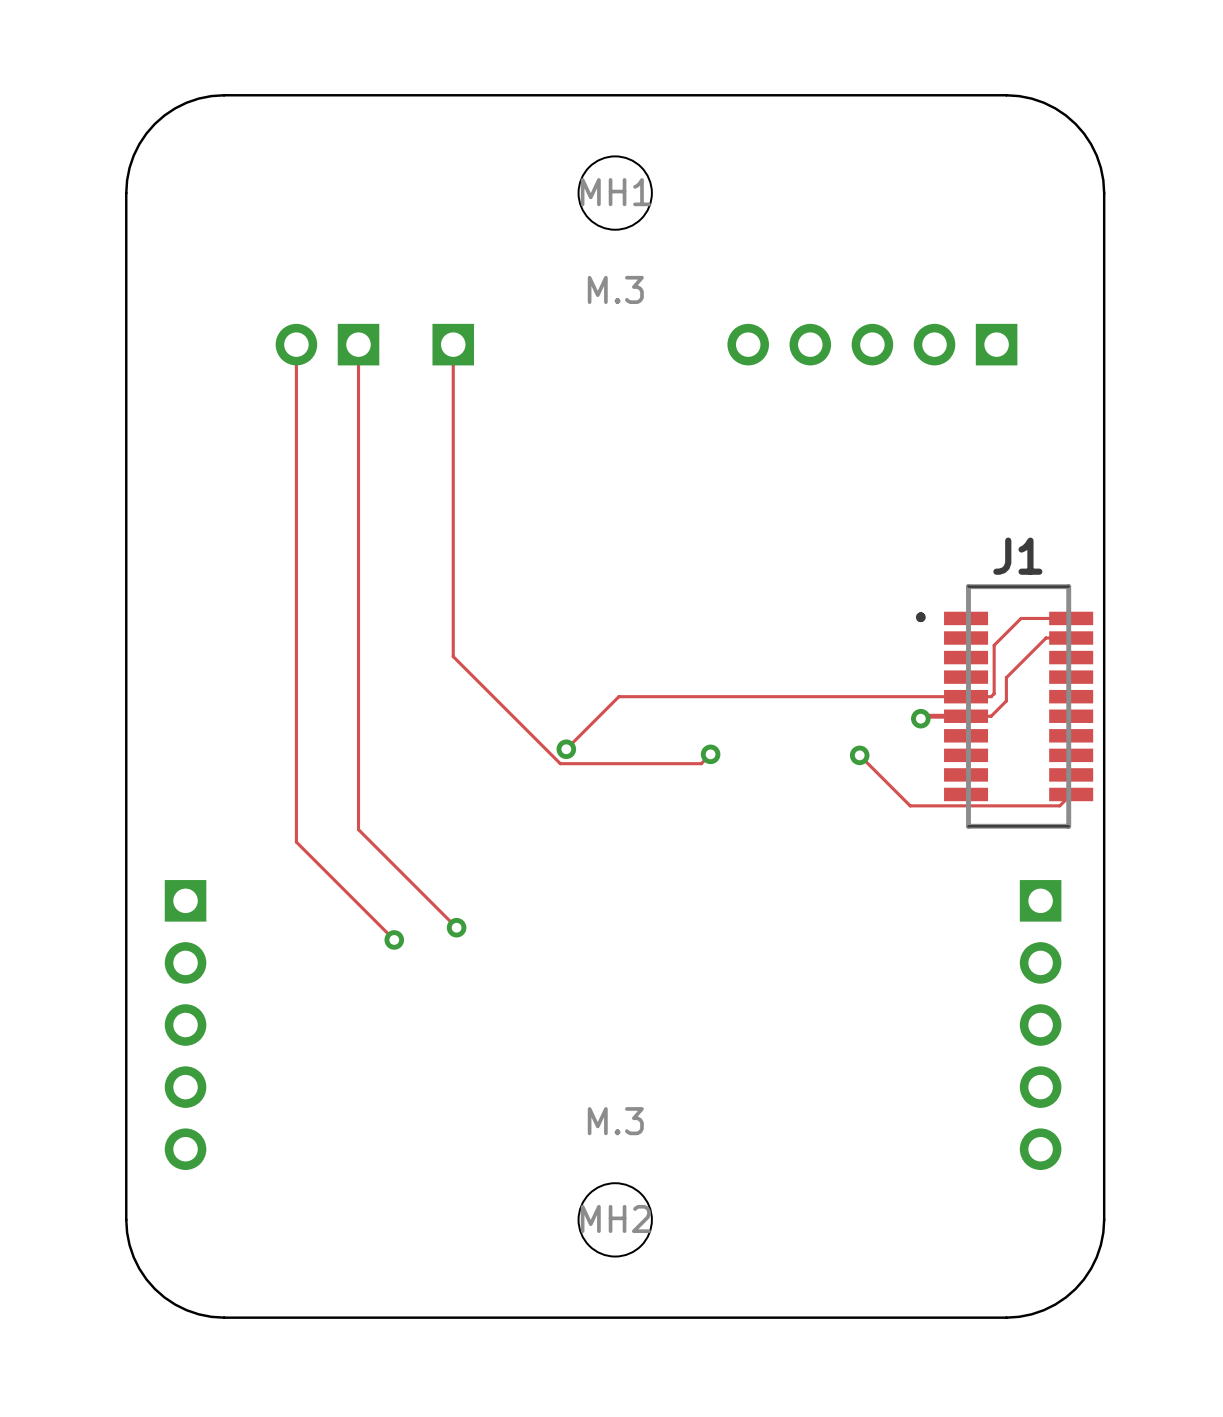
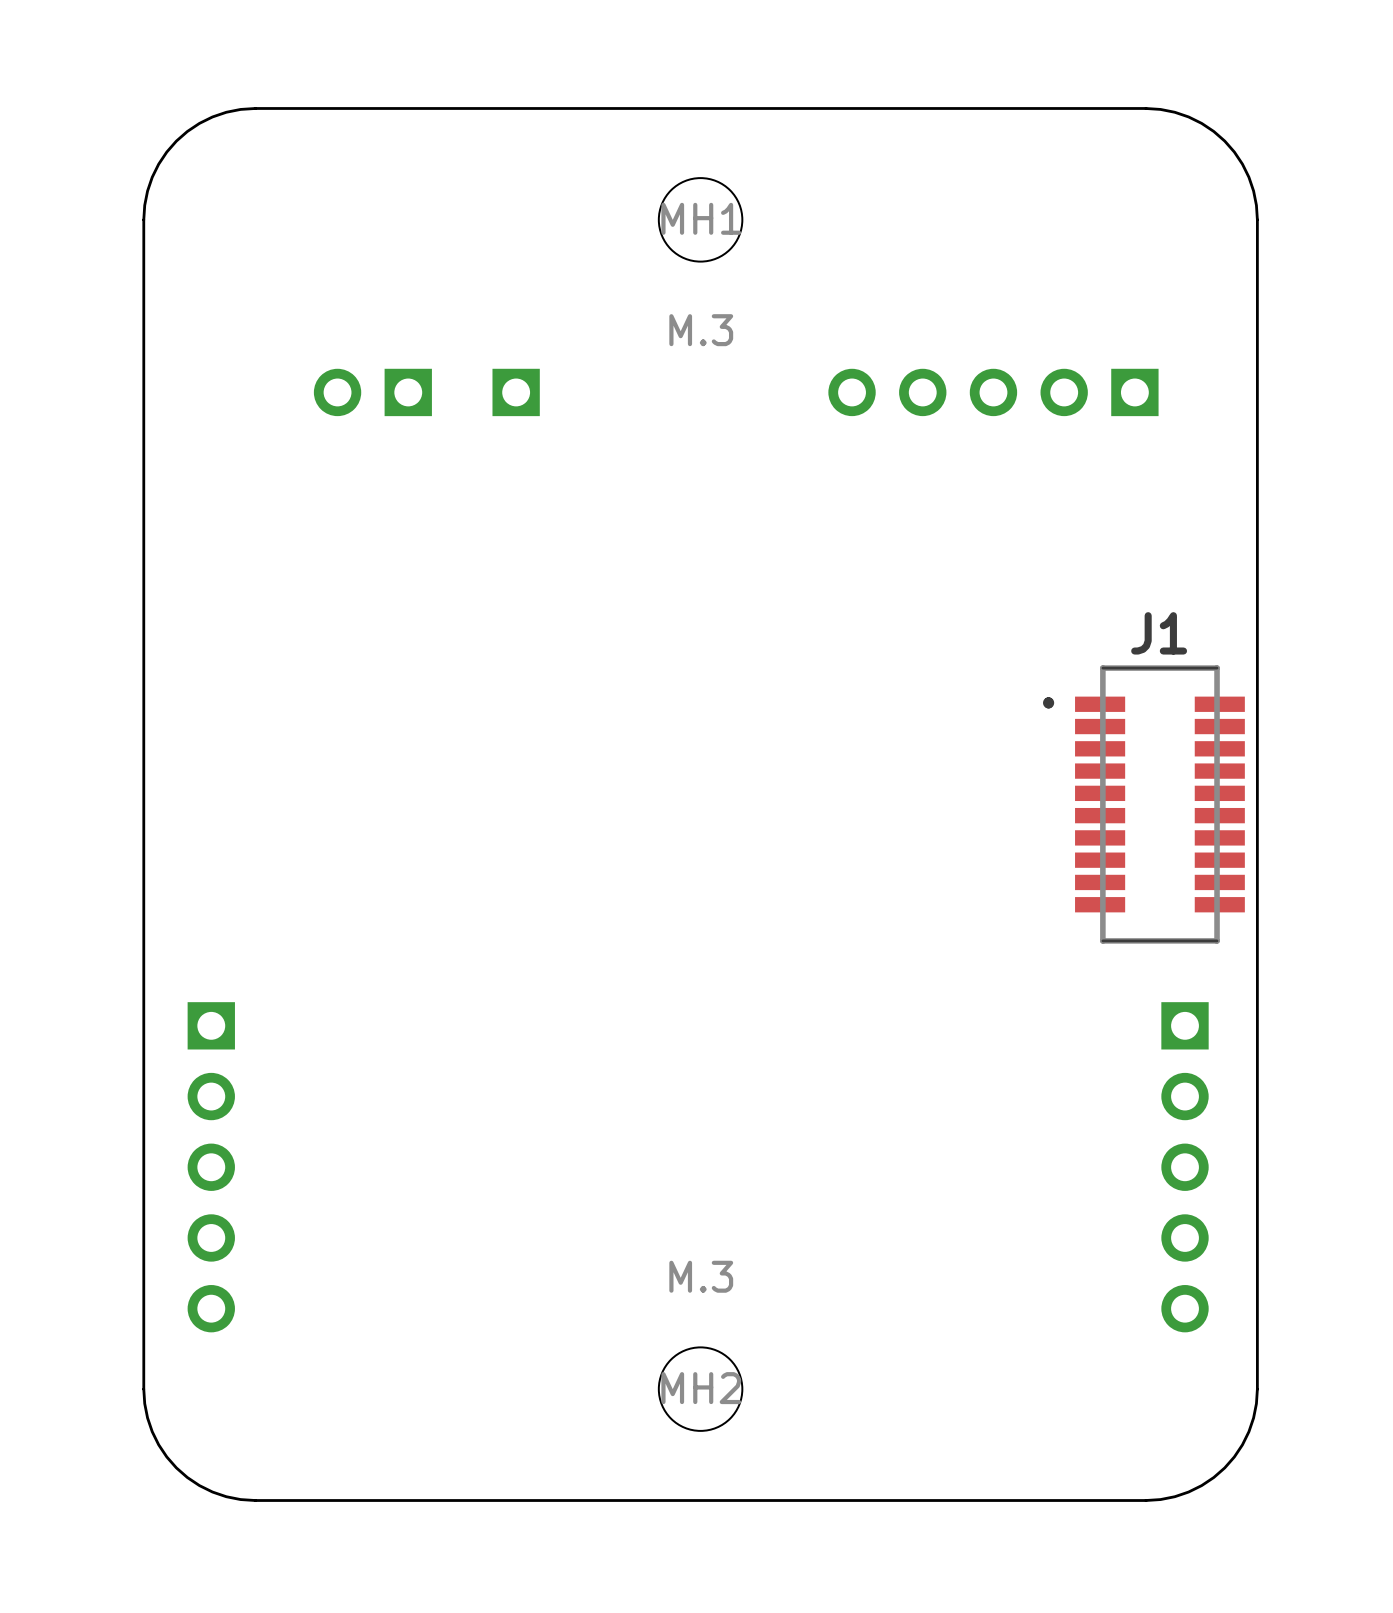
track: (296, 344) (296, 842) (394, 939) -> none
track: (358, 344) (358, 829) (456, 927) -> none
track: (453, 344) (453, 656) (560, 763) (701, 763) (710, 754) -> none
track: (1071, 618) (1021, 618) (994, 645) (994, 693) (991, 696) (618, 696) (566, 749) -> none
track: (1071, 638) (1046, 638) (1006, 677) (1006, 701) (991, 716) (923, 716) (920, 718) -> none
via: (920, 718) -> none
via: (566, 749) -> none
via: (710, 754) -> none
track: (859, 755) (910, 805) (1059, 805) (1071, 794) -> none
via: (859, 755) -> none
via: (456, 927) -> none
via: (394, 939) -> none

